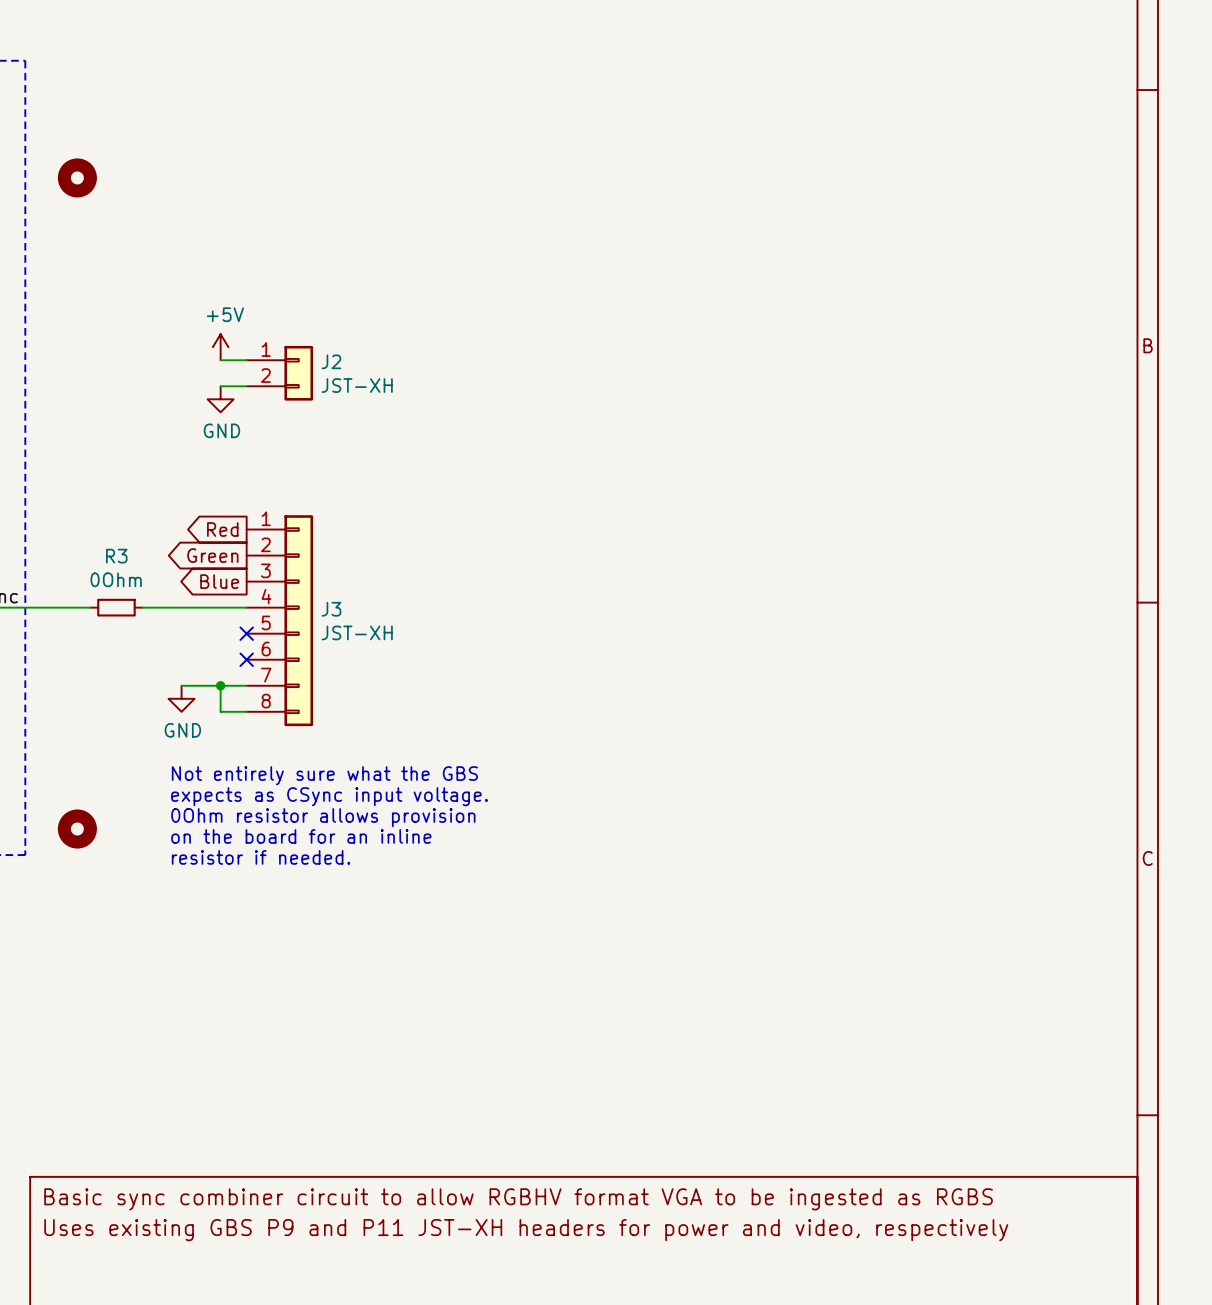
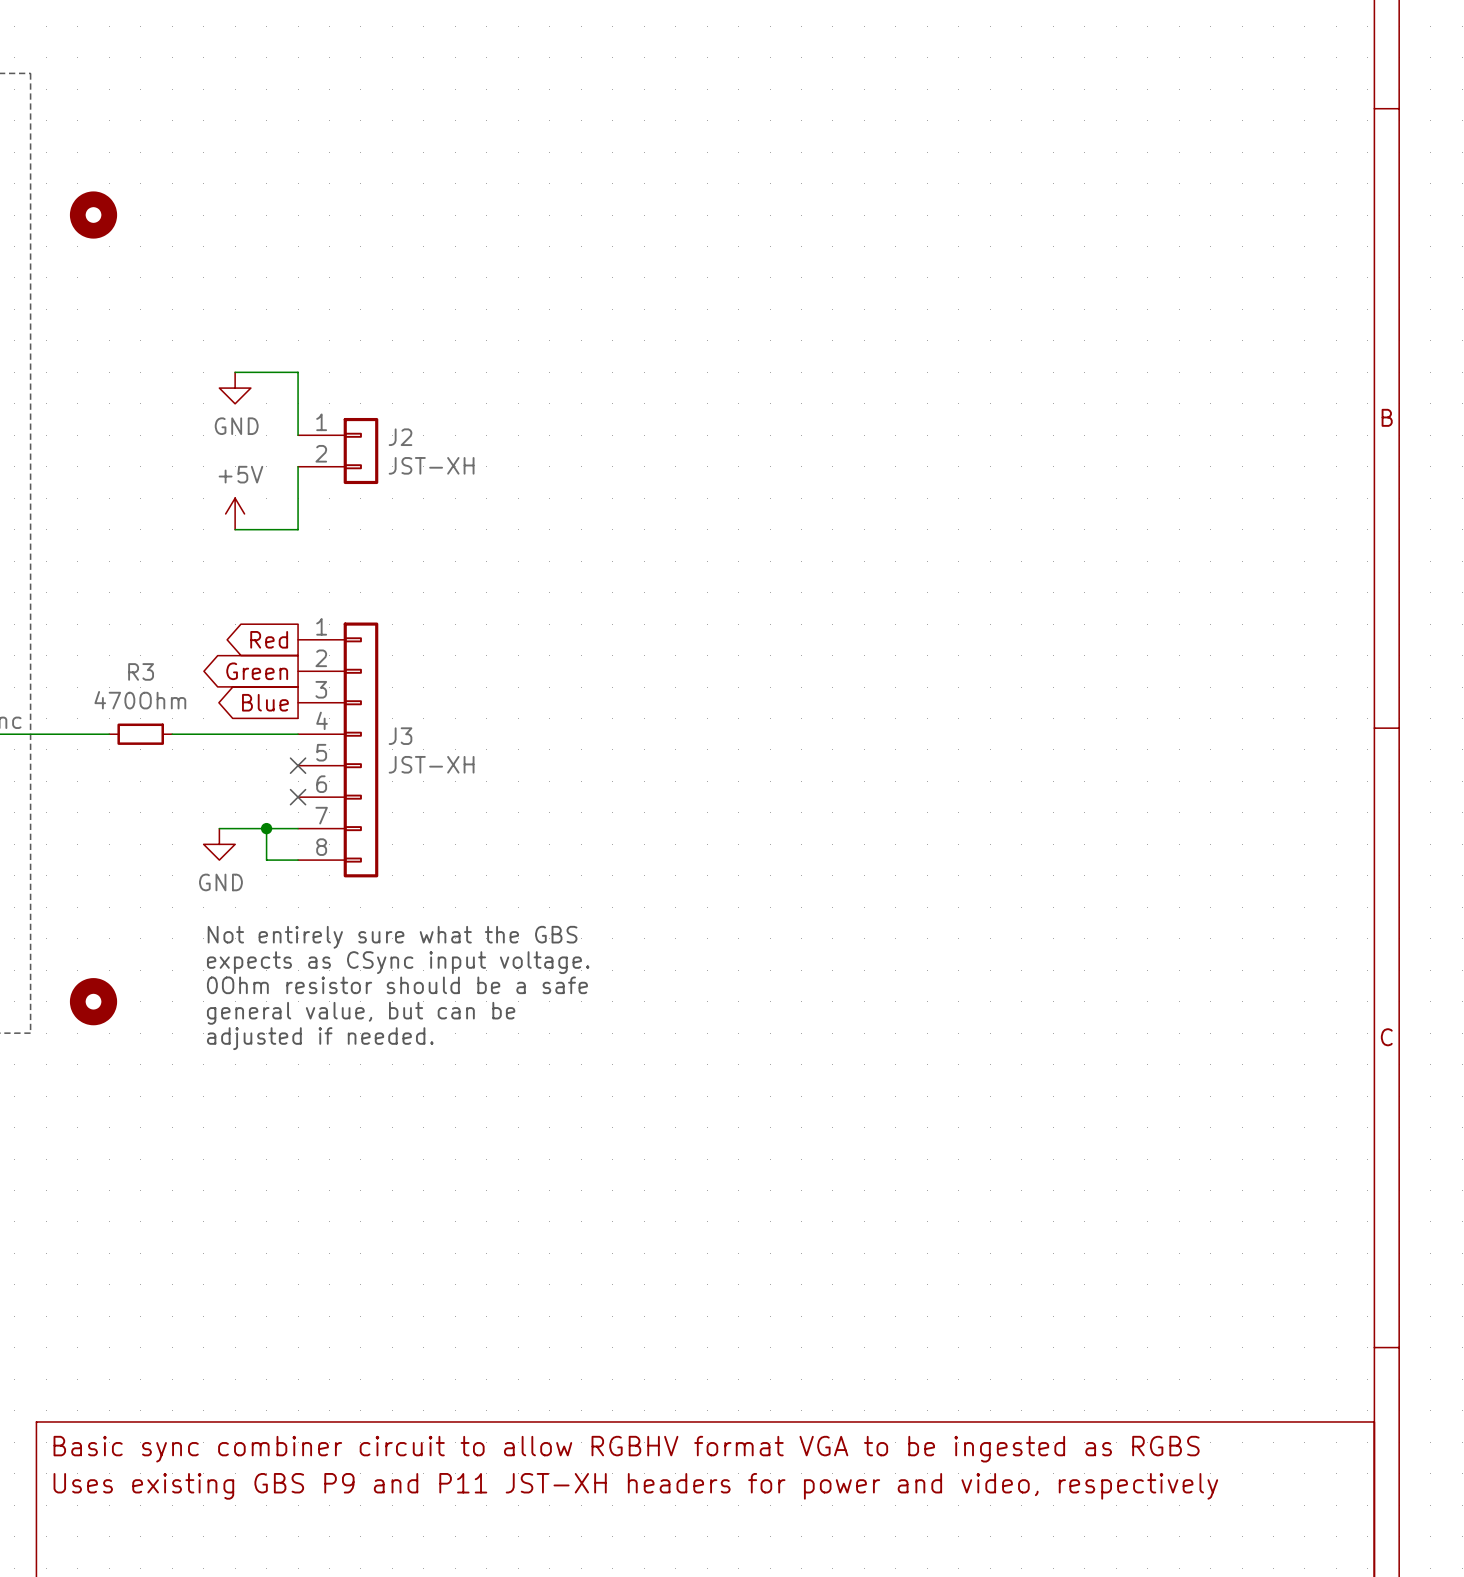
power symbol position: +5V (220, 347) -> +5V (235, 513)
wire: (220, 360) (246, 360) -> (235, 372) (298, 372) (298, 435)
wire: (220, 386) (246, 386) -> (235, 529) (298, 529) (298, 466)
power symbol position: GND (220, 399) -> GND (235, 388)
R3 value: 0Ohm (116, 579) -> 470Ohm (140, 700)
text: 0Ohm resistor allows provision (323, 817) -> 0Ohm resistor should be a safe (397, 985)
text: on the board for an inline (301, 836) -> general value, but can be (361, 1013)
text: resistor if needed. (261, 857) -> adjusted if needed. (320, 1038)

